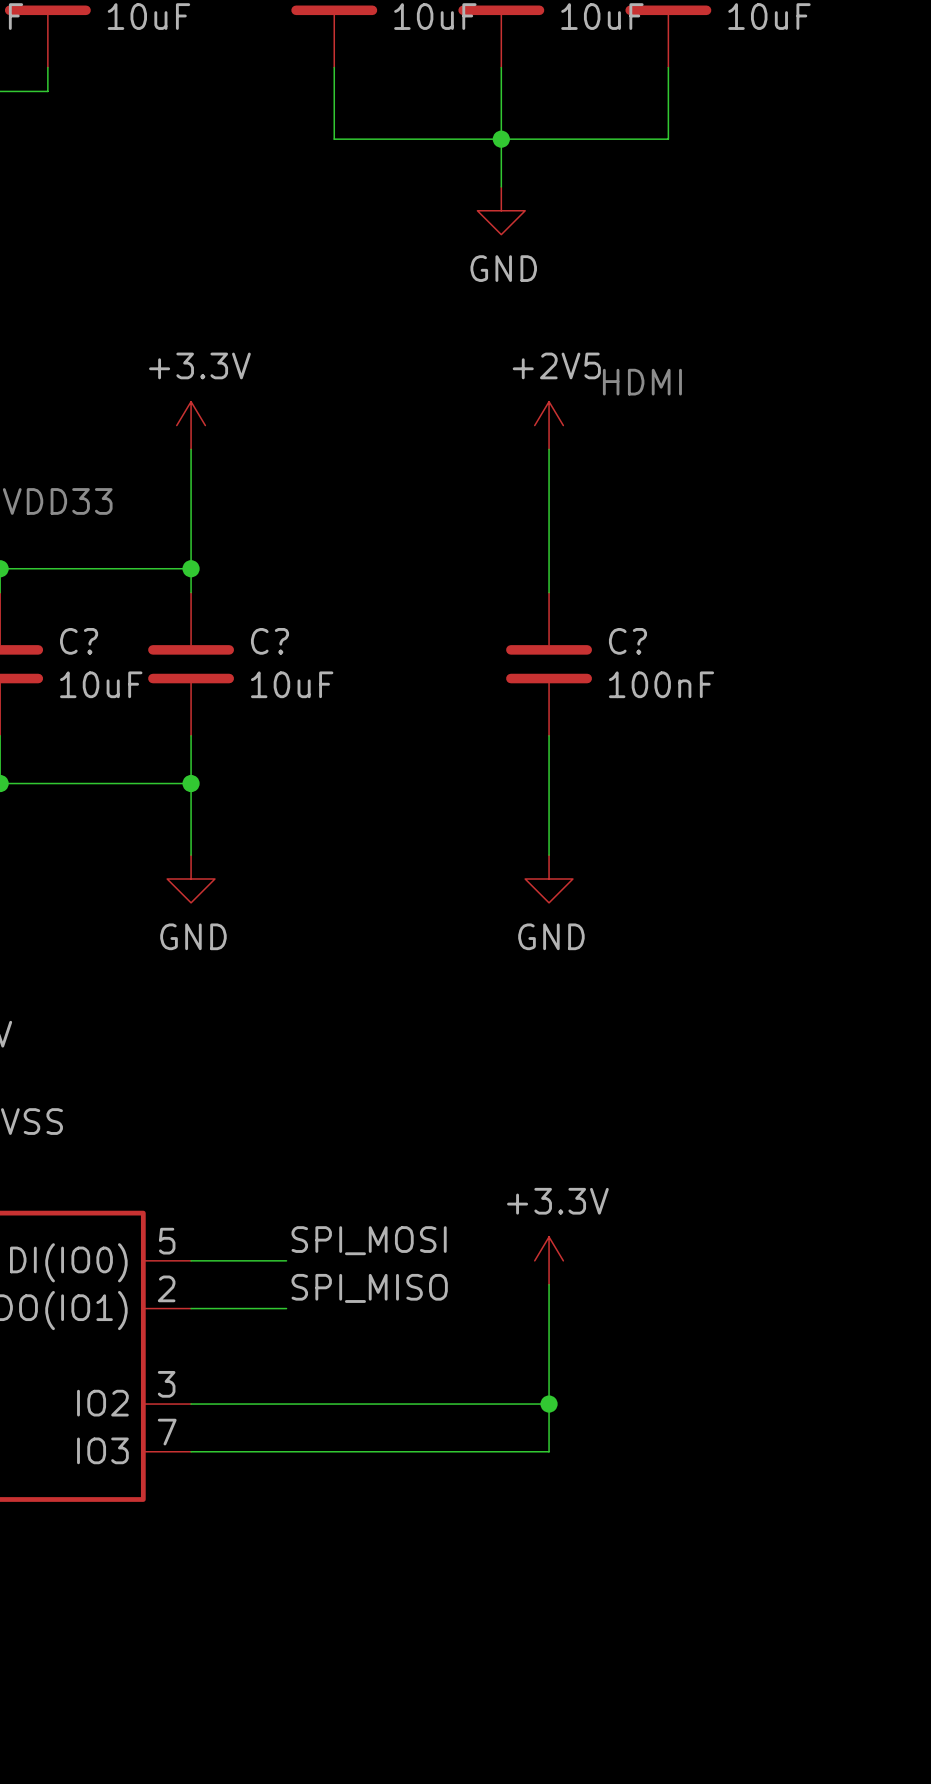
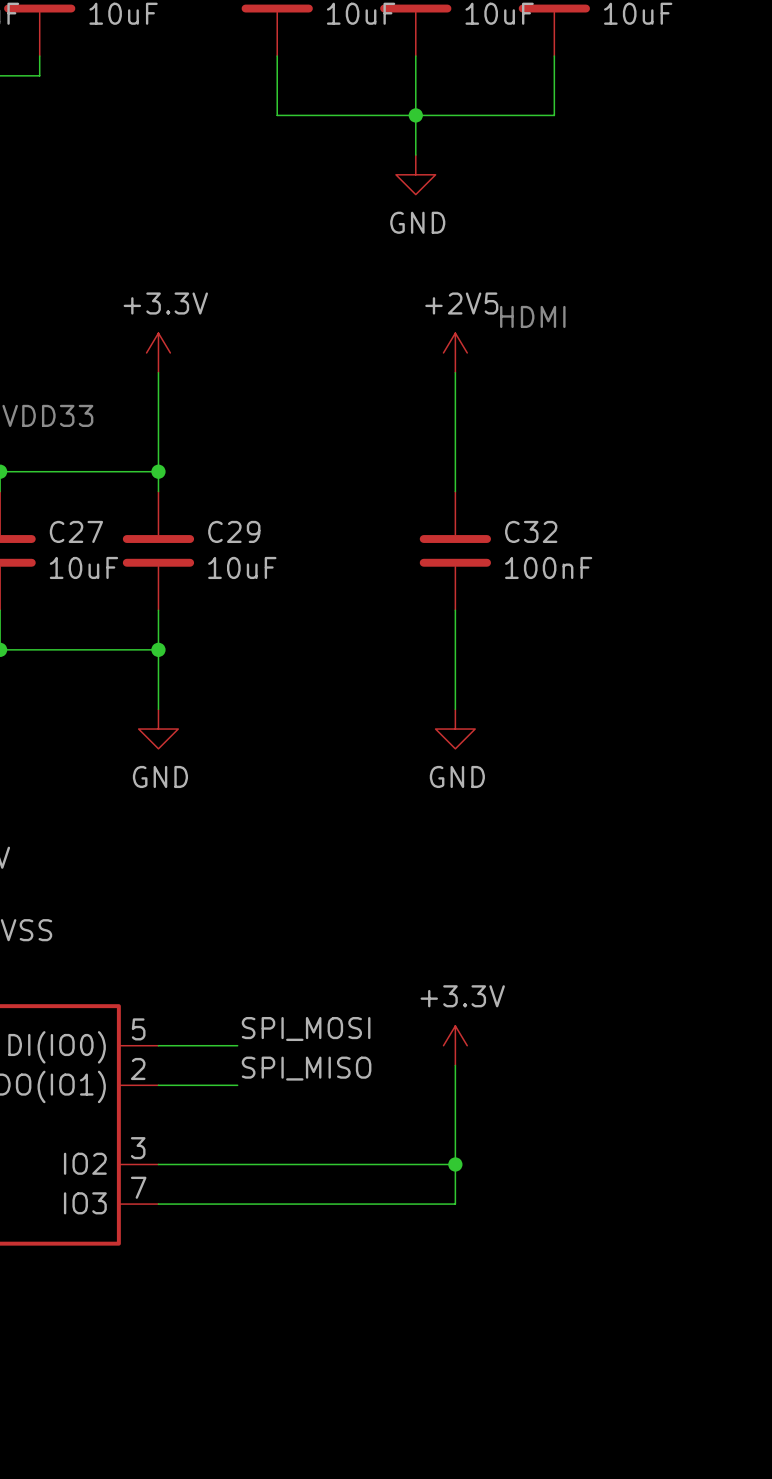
C? name: C? (79, 641) -> C27 (76, 531)
C? name: C? (270, 641) -> C29 (234, 531)
C? name: C? (627, 641) -> C32 (531, 531)

